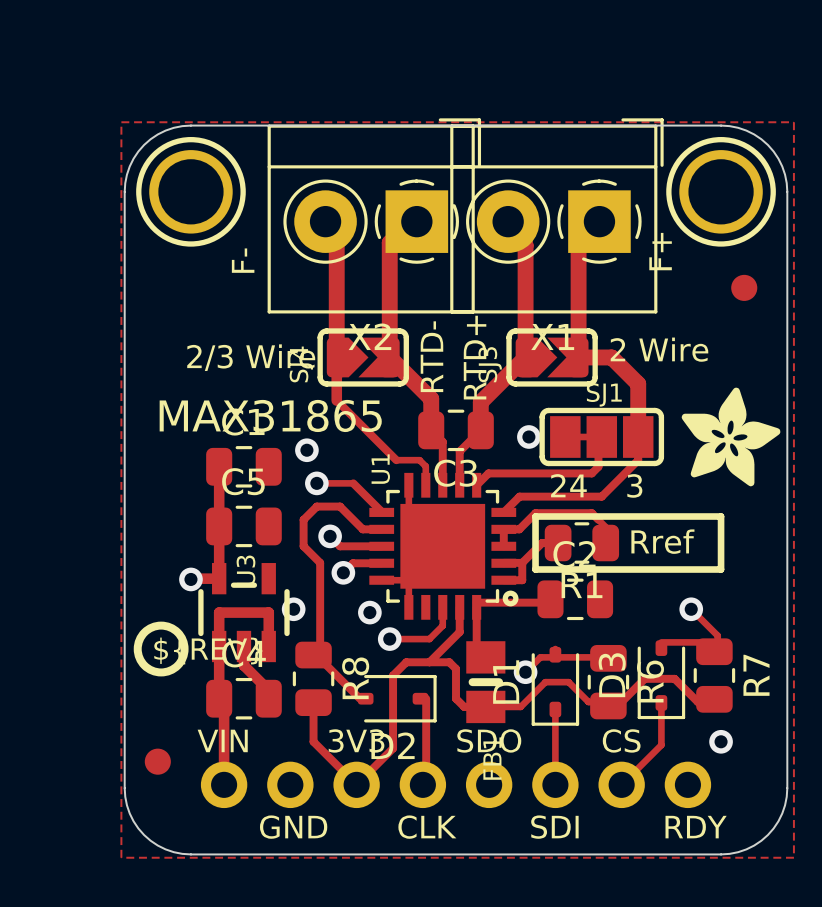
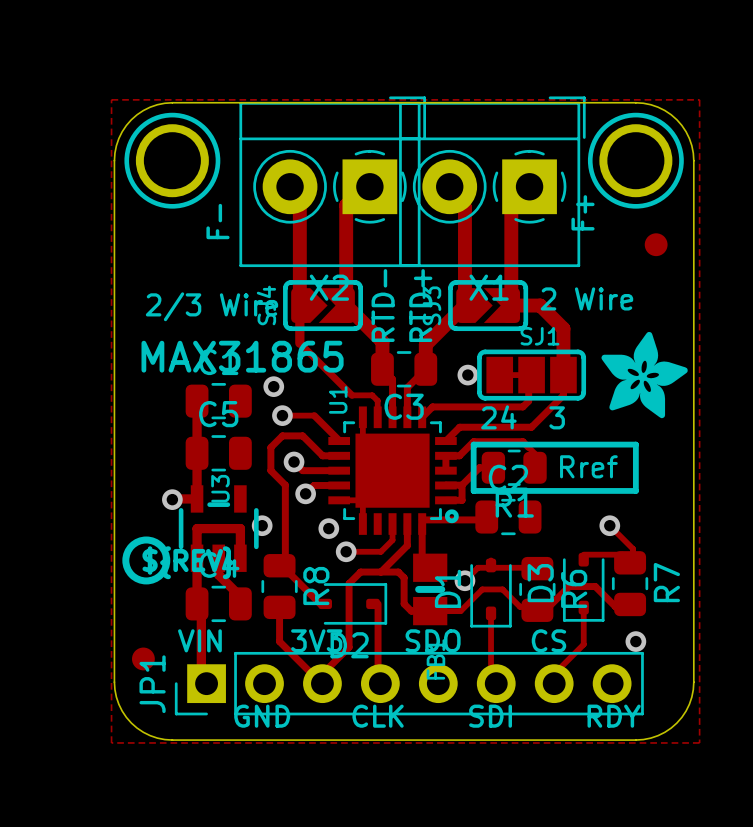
part: (456, 784) -> none
JP1: none -> (409, 683)

